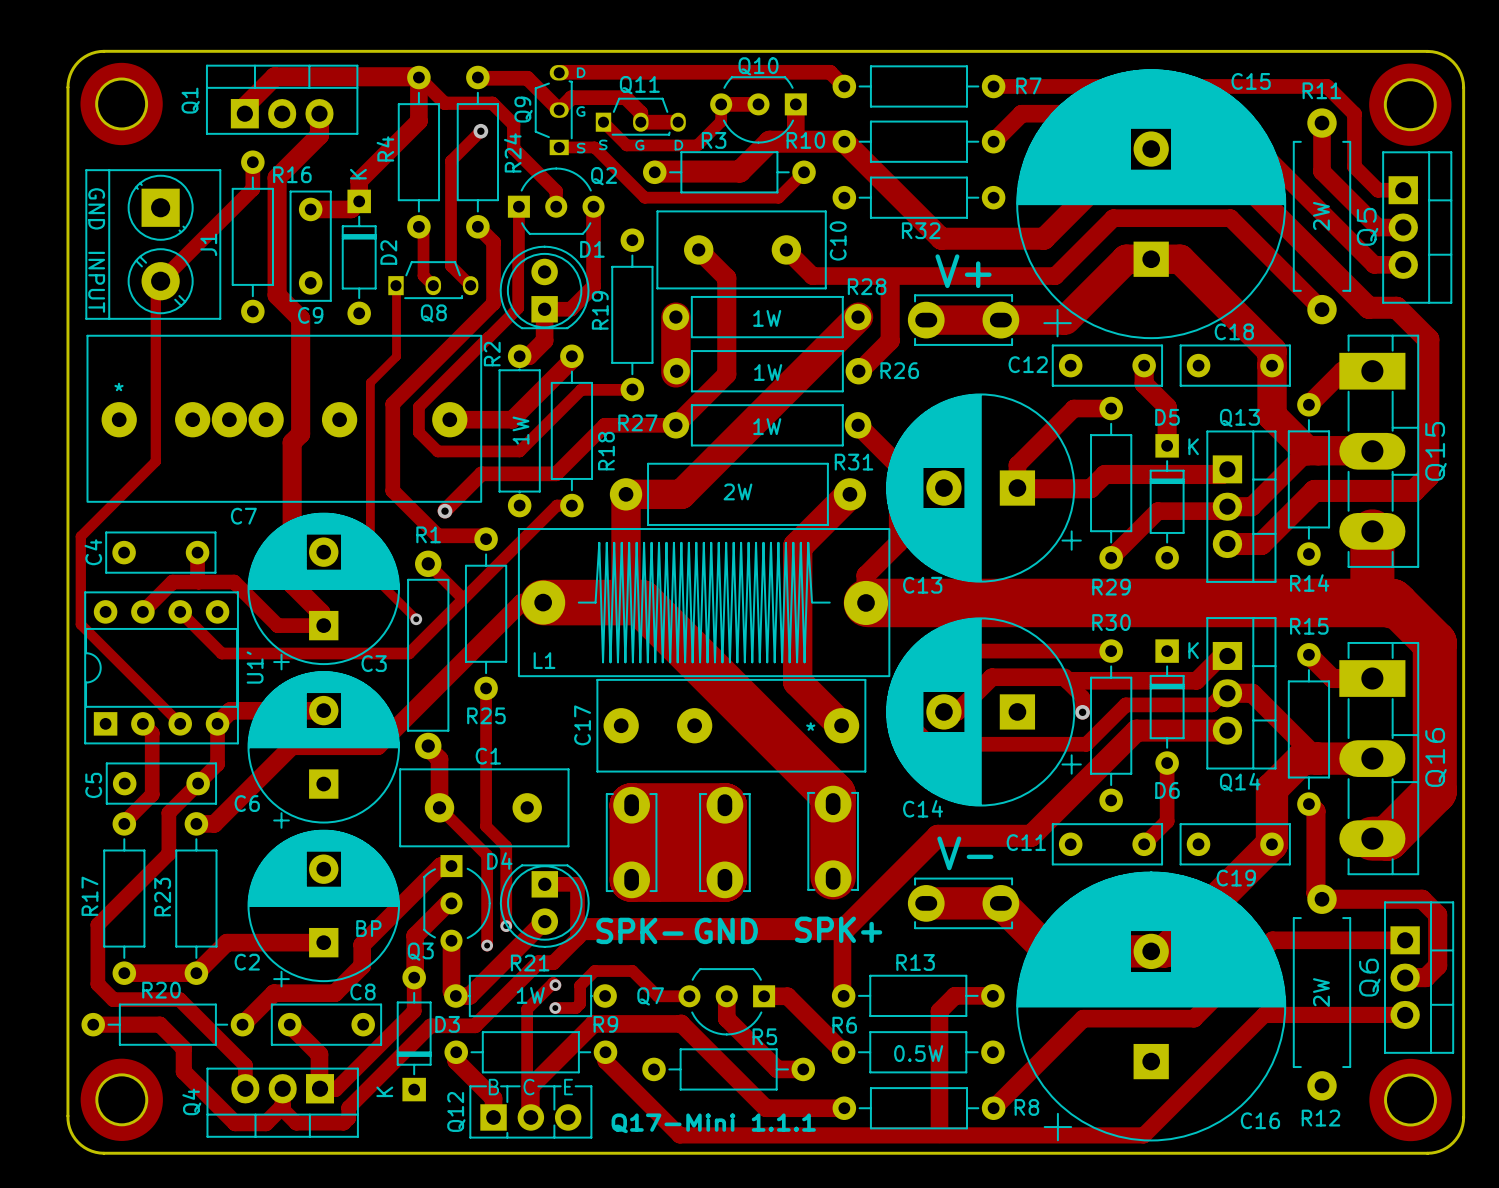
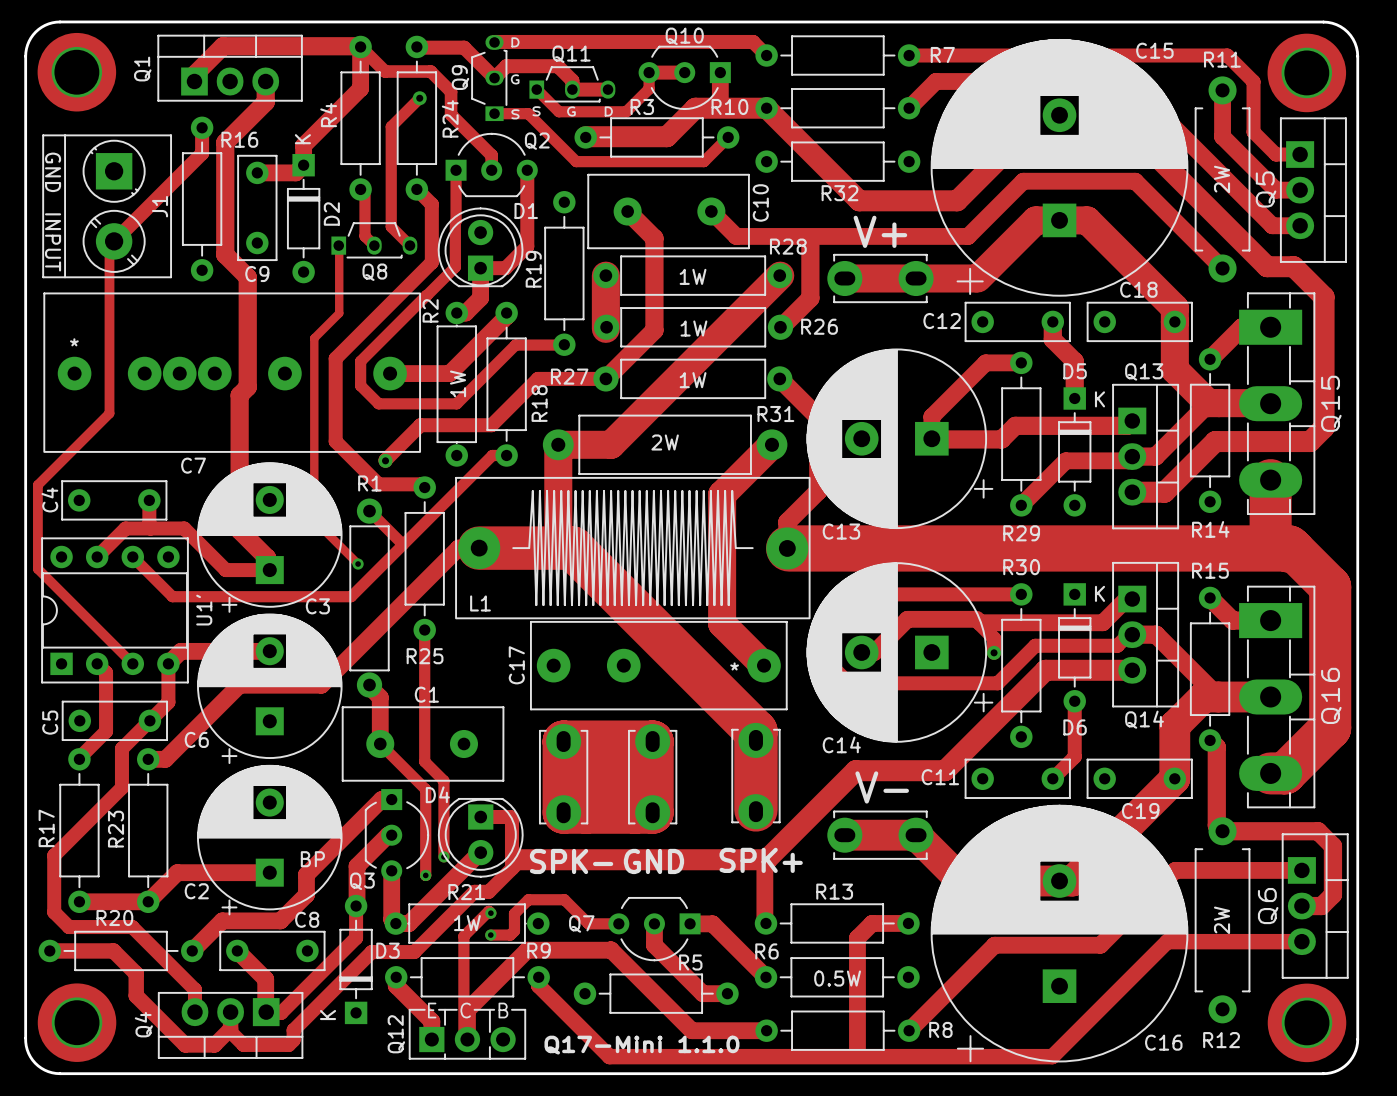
Q12 footprint: [469, 1085, 593, 1139] -> [408, 1008, 527, 1060]
text: Q17-Mini 1.1.1 (713, 1123) -> Q17-Mini 1.1.0 (641, 1045)

